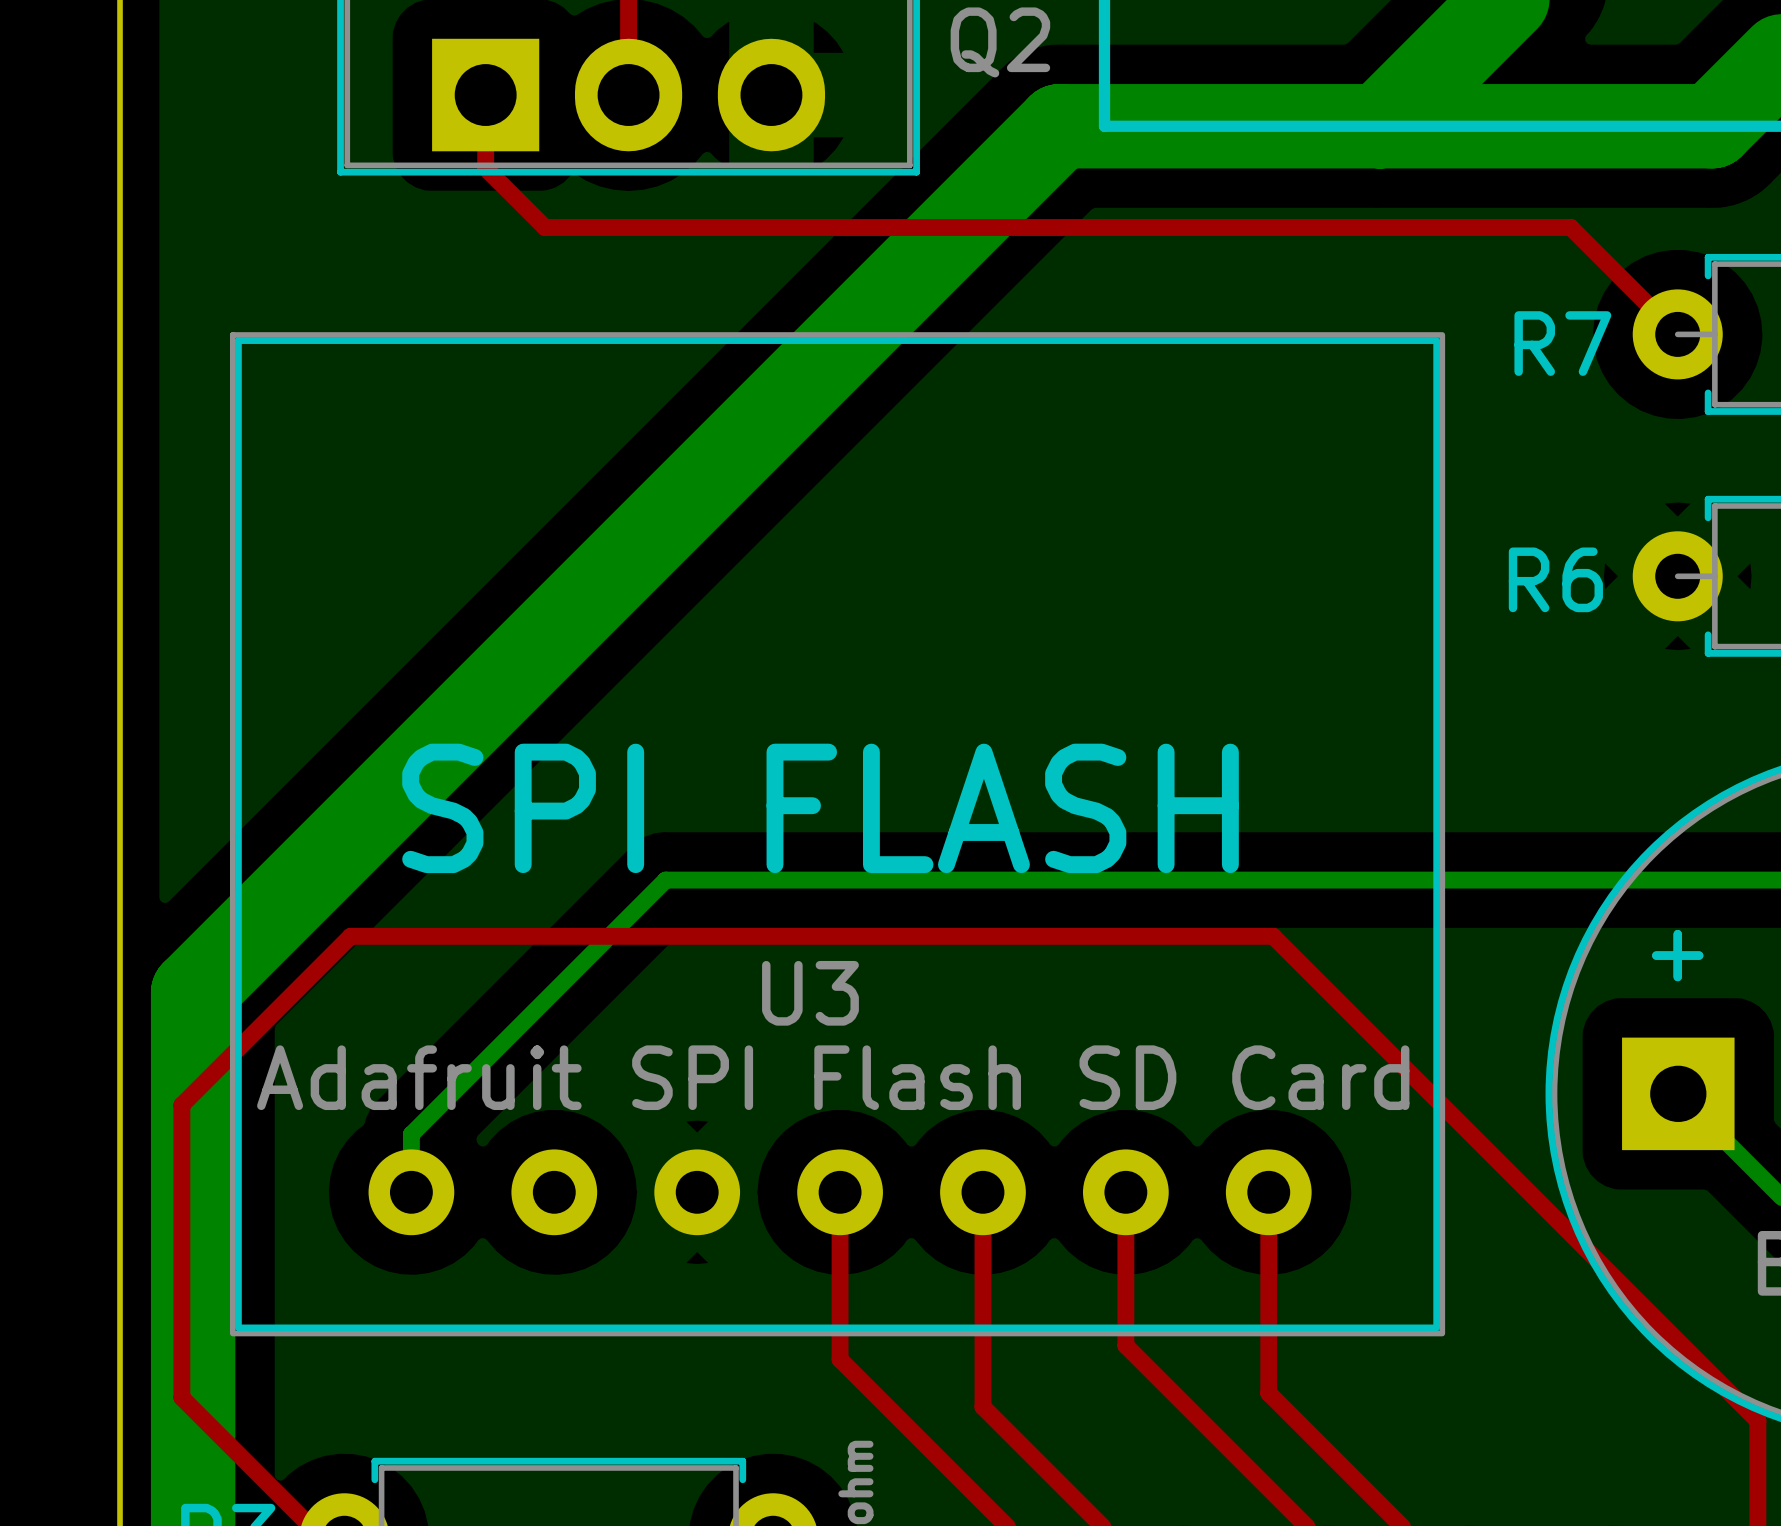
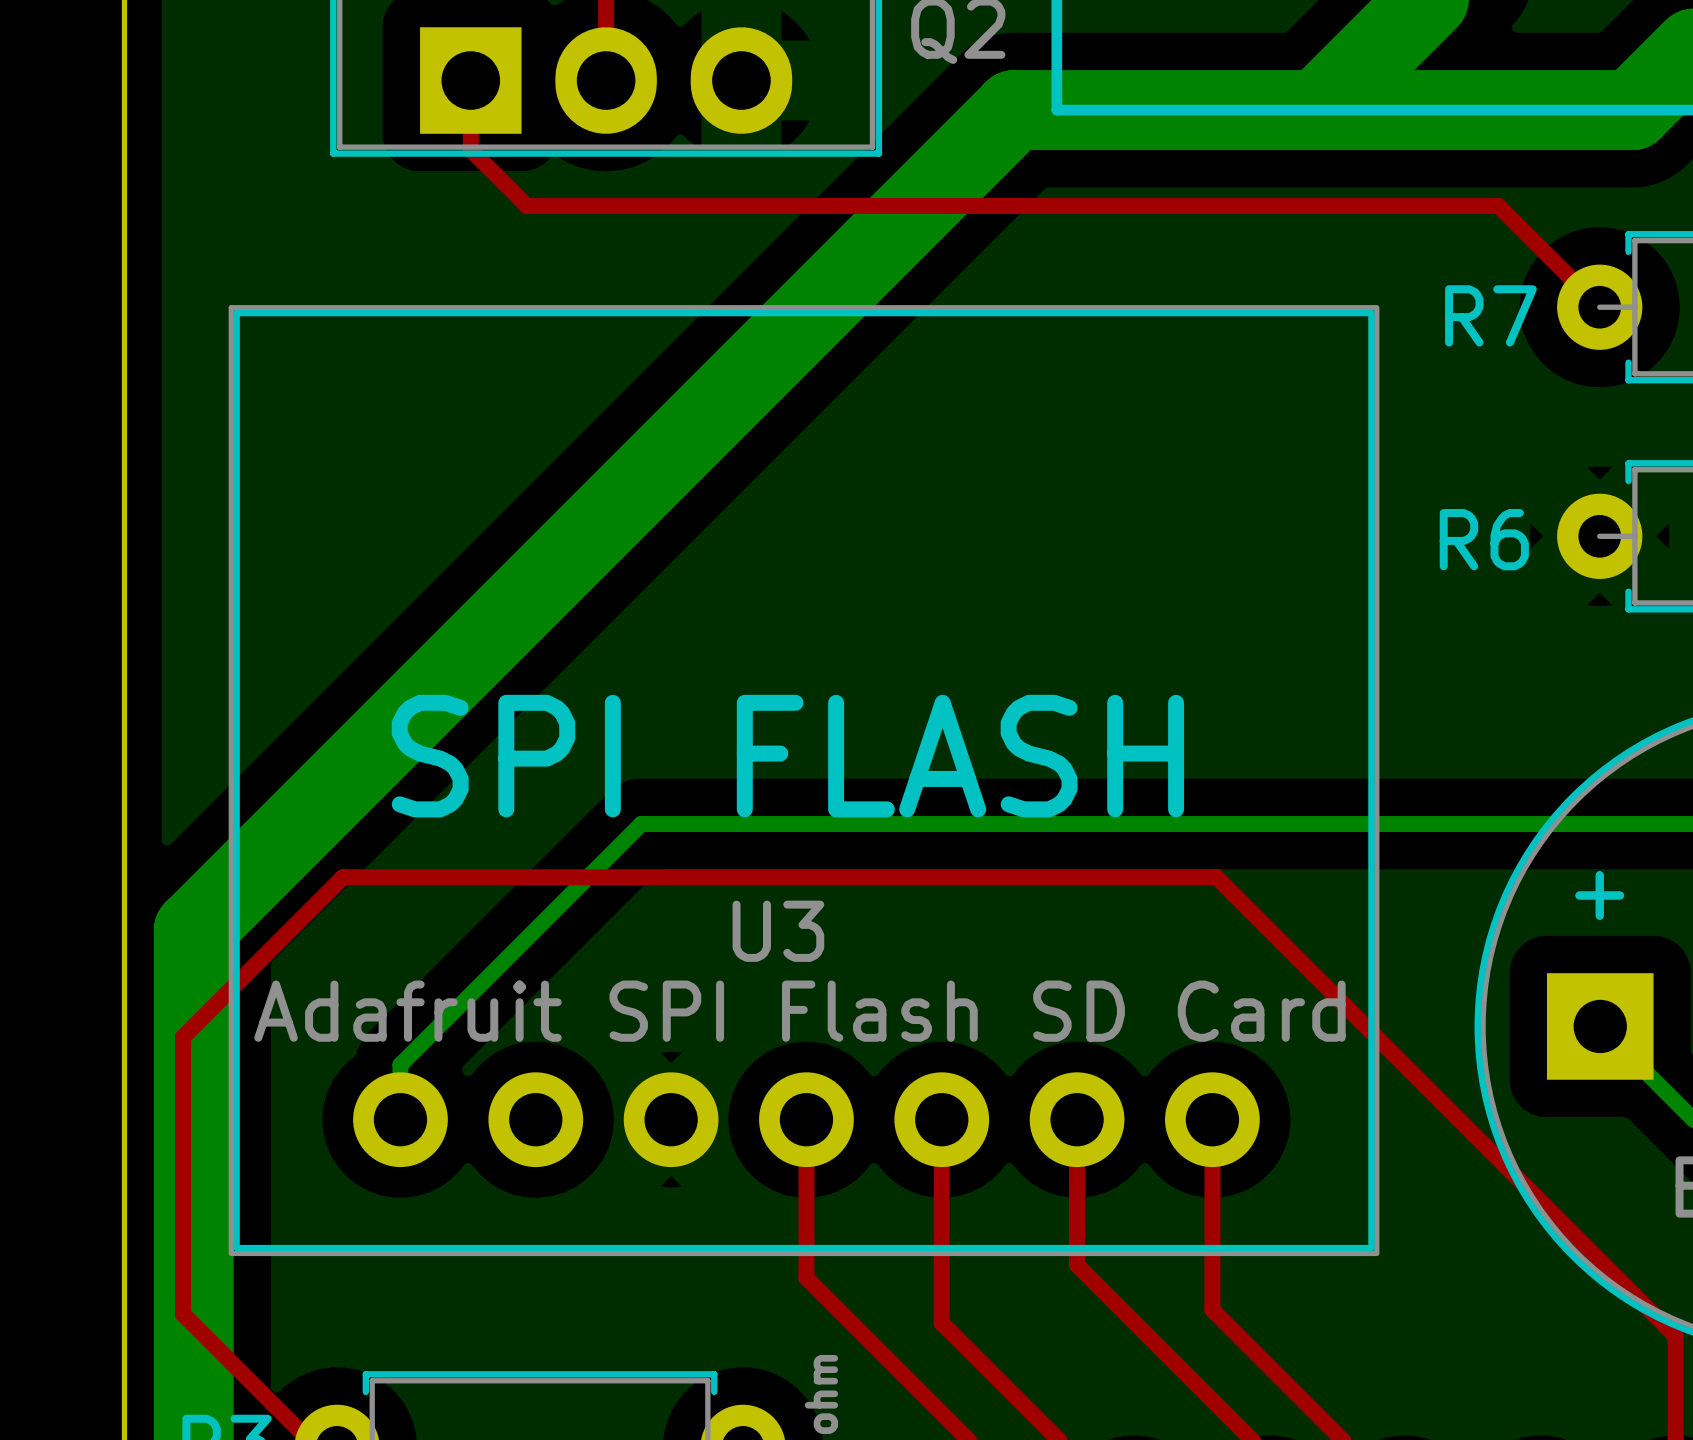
U3 footprint: [229, 332, 1446, 1337] -> [228, 305, 1380, 1257]

